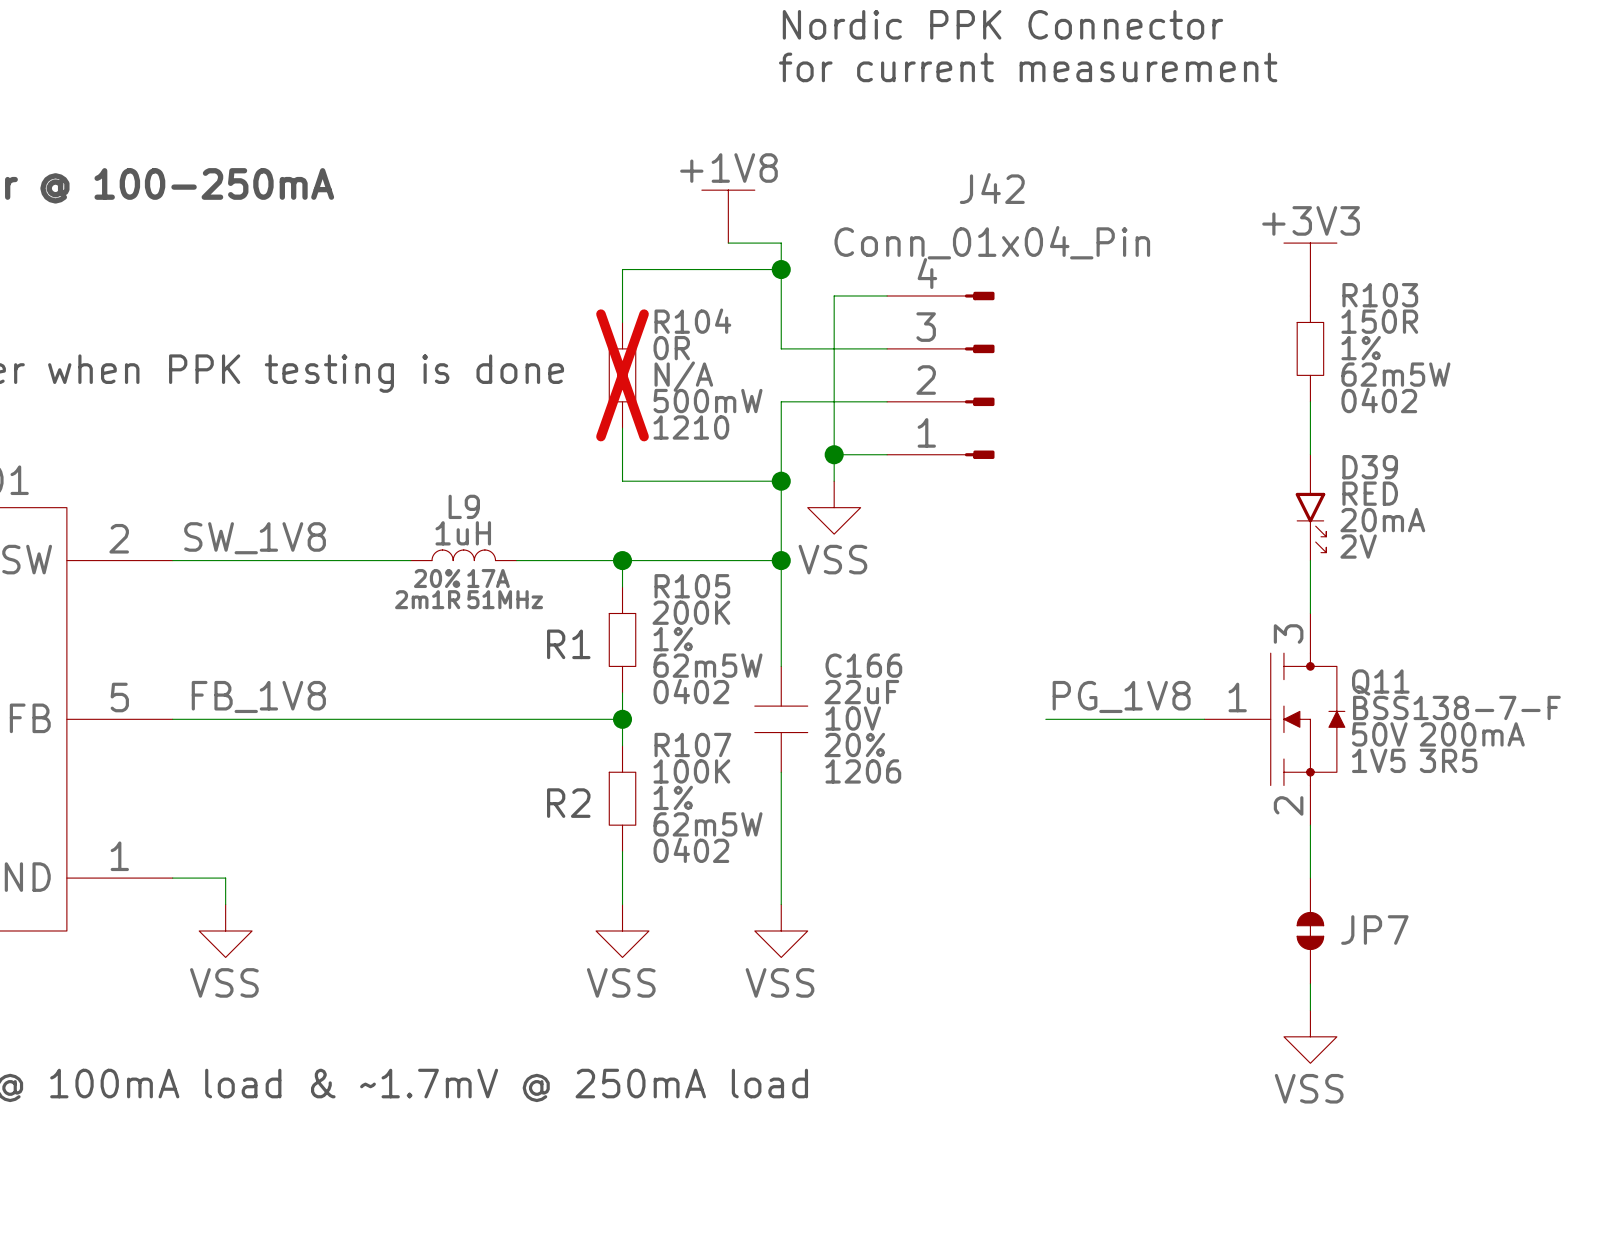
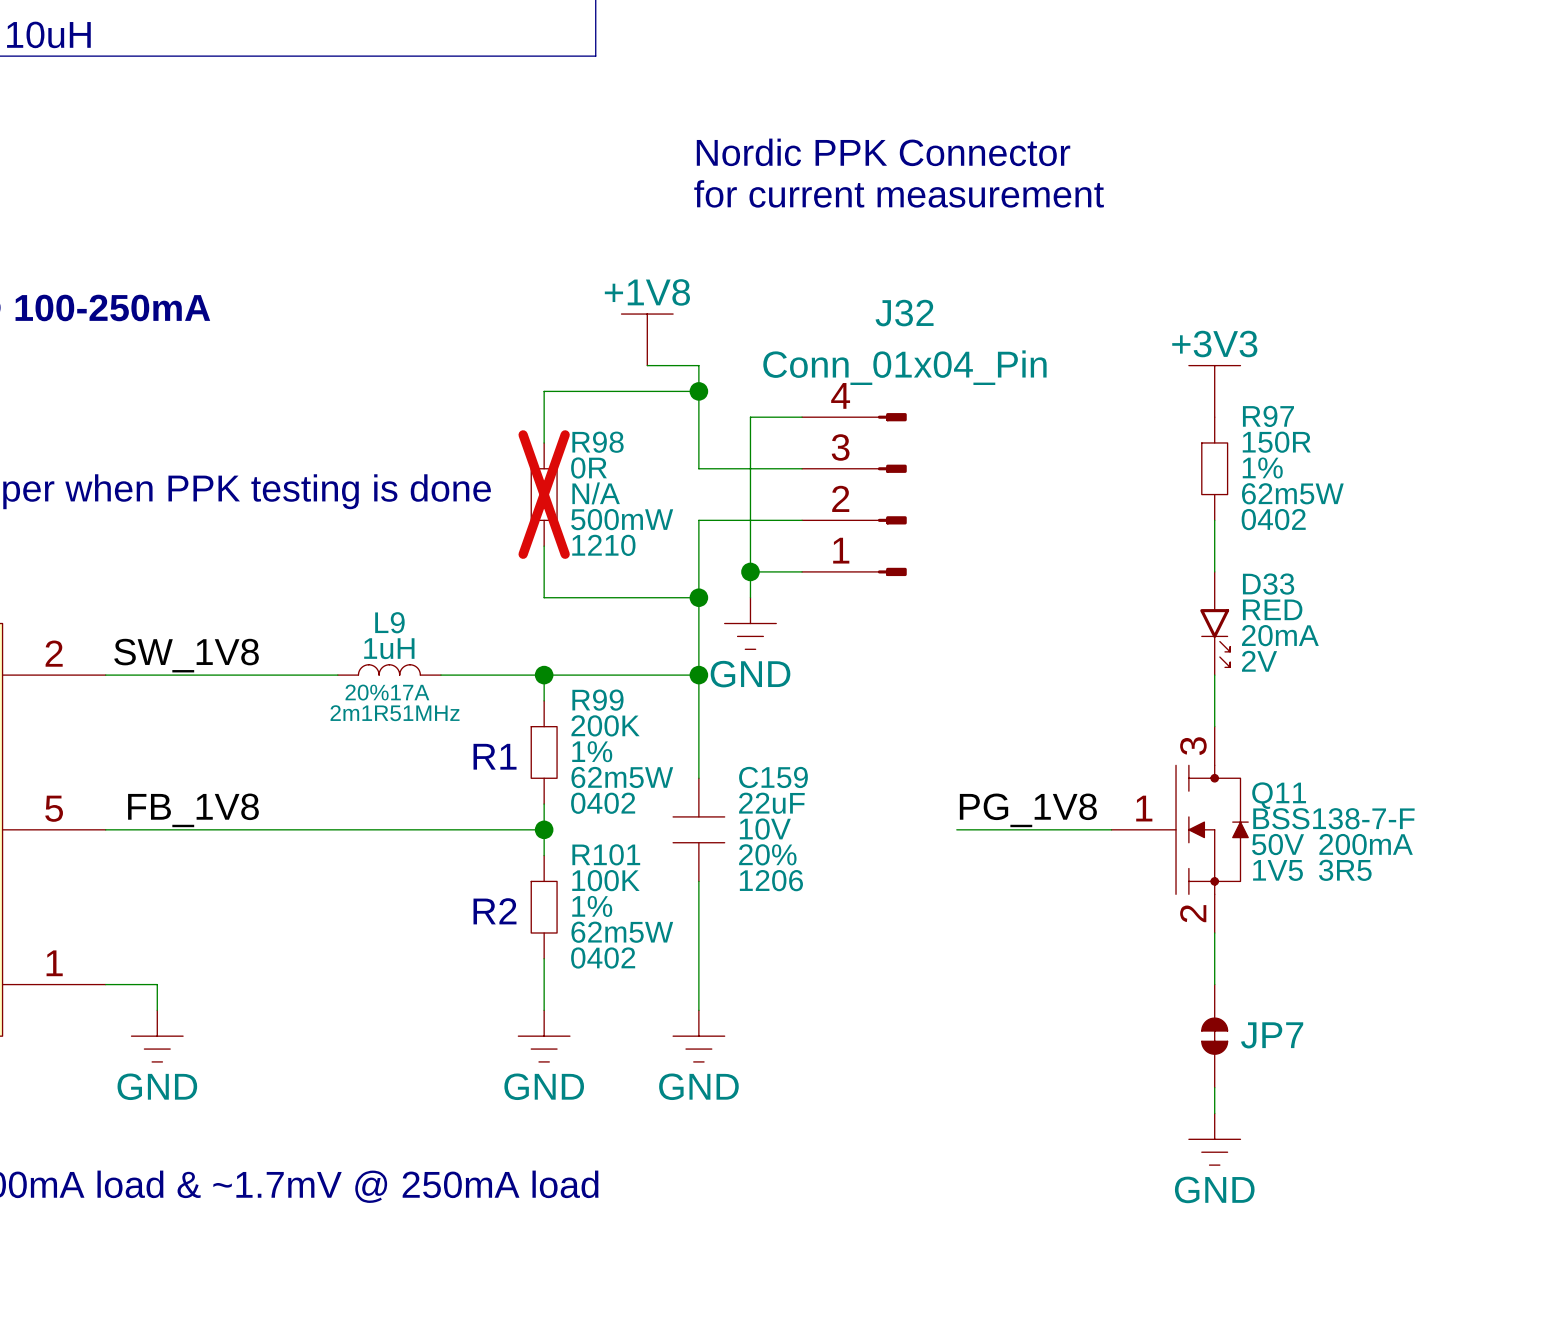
J42 name: J42 (992, 188) -> J32 (904, 313)
R103 name: R103 (1380, 295) -> R97 (1268, 416)
R104 name: R104 (692, 321) -> R98 (598, 442)
D39 name: D39 (1370, 467) -> D33 (1268, 584)
power symbol: VSS (834, 507) -> GND (750, 623)
R105 name: R105 (692, 586) -> R99 (597, 700)
C166 name: C166 (863, 665) -> C159 (773, 777)
R107 name: R107 (692, 744) -> R101 (606, 854)
power symbol: VSS (225, 930) -> GND (157, 1036)
power symbol: VSS (622, 930) -> GND (544, 1036)
power symbol: VSS (781, 930) -> GND (698, 1036)
power symbol: VSS (1310, 1036) -> GND (1214, 1139)

